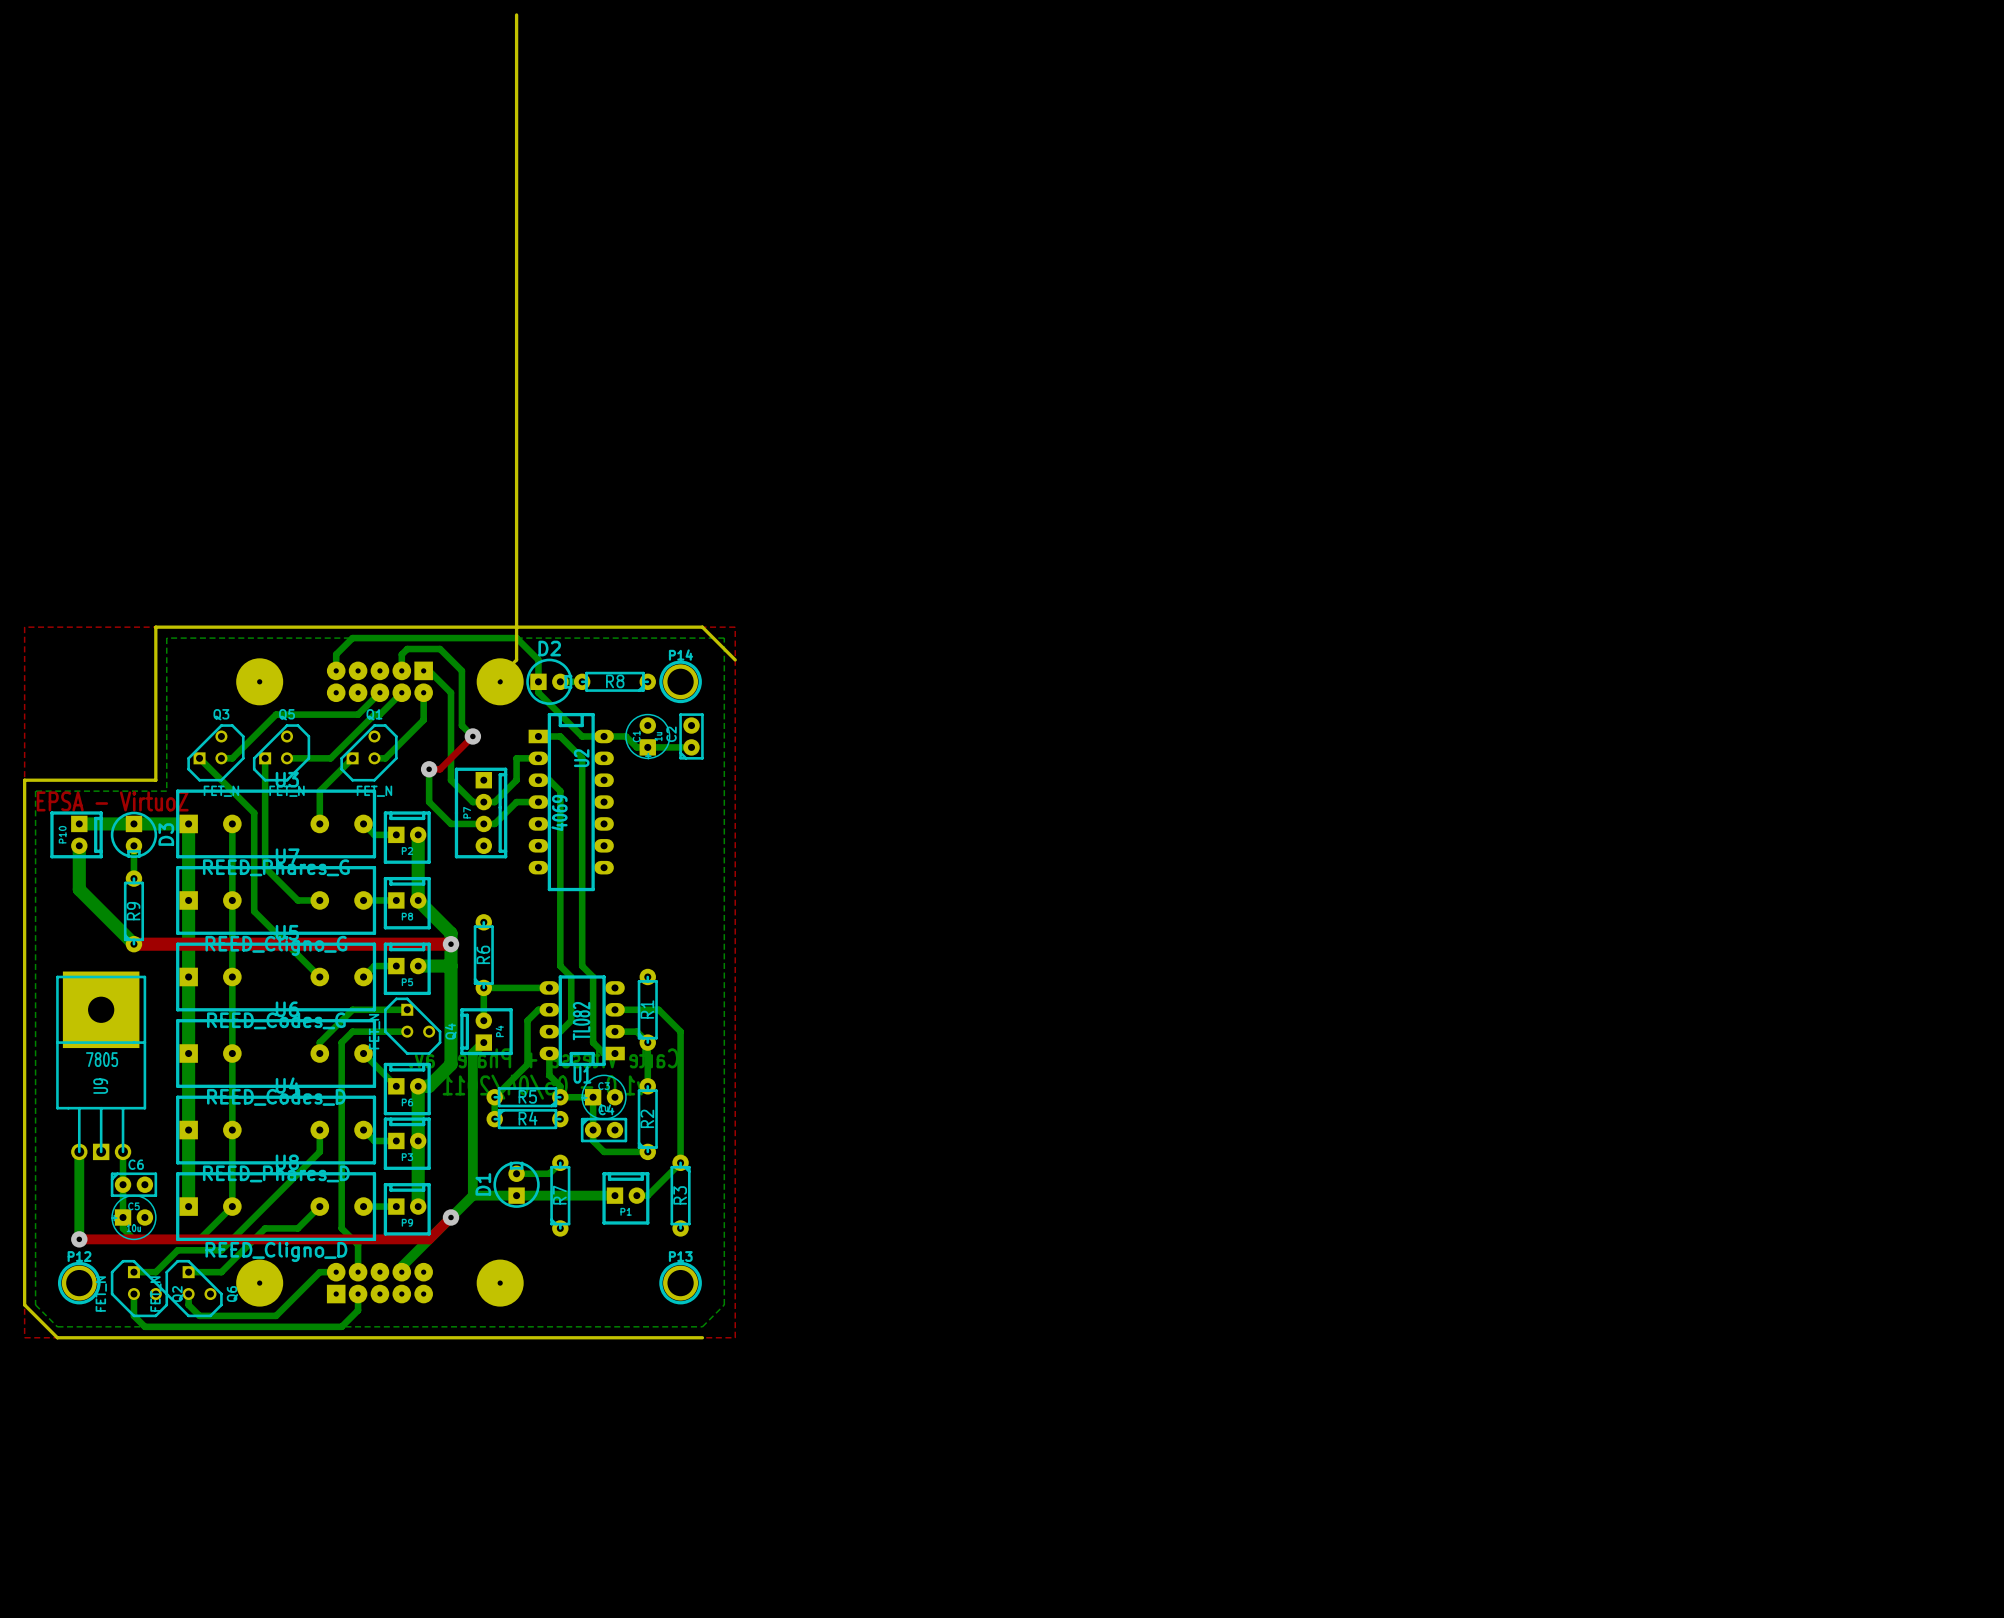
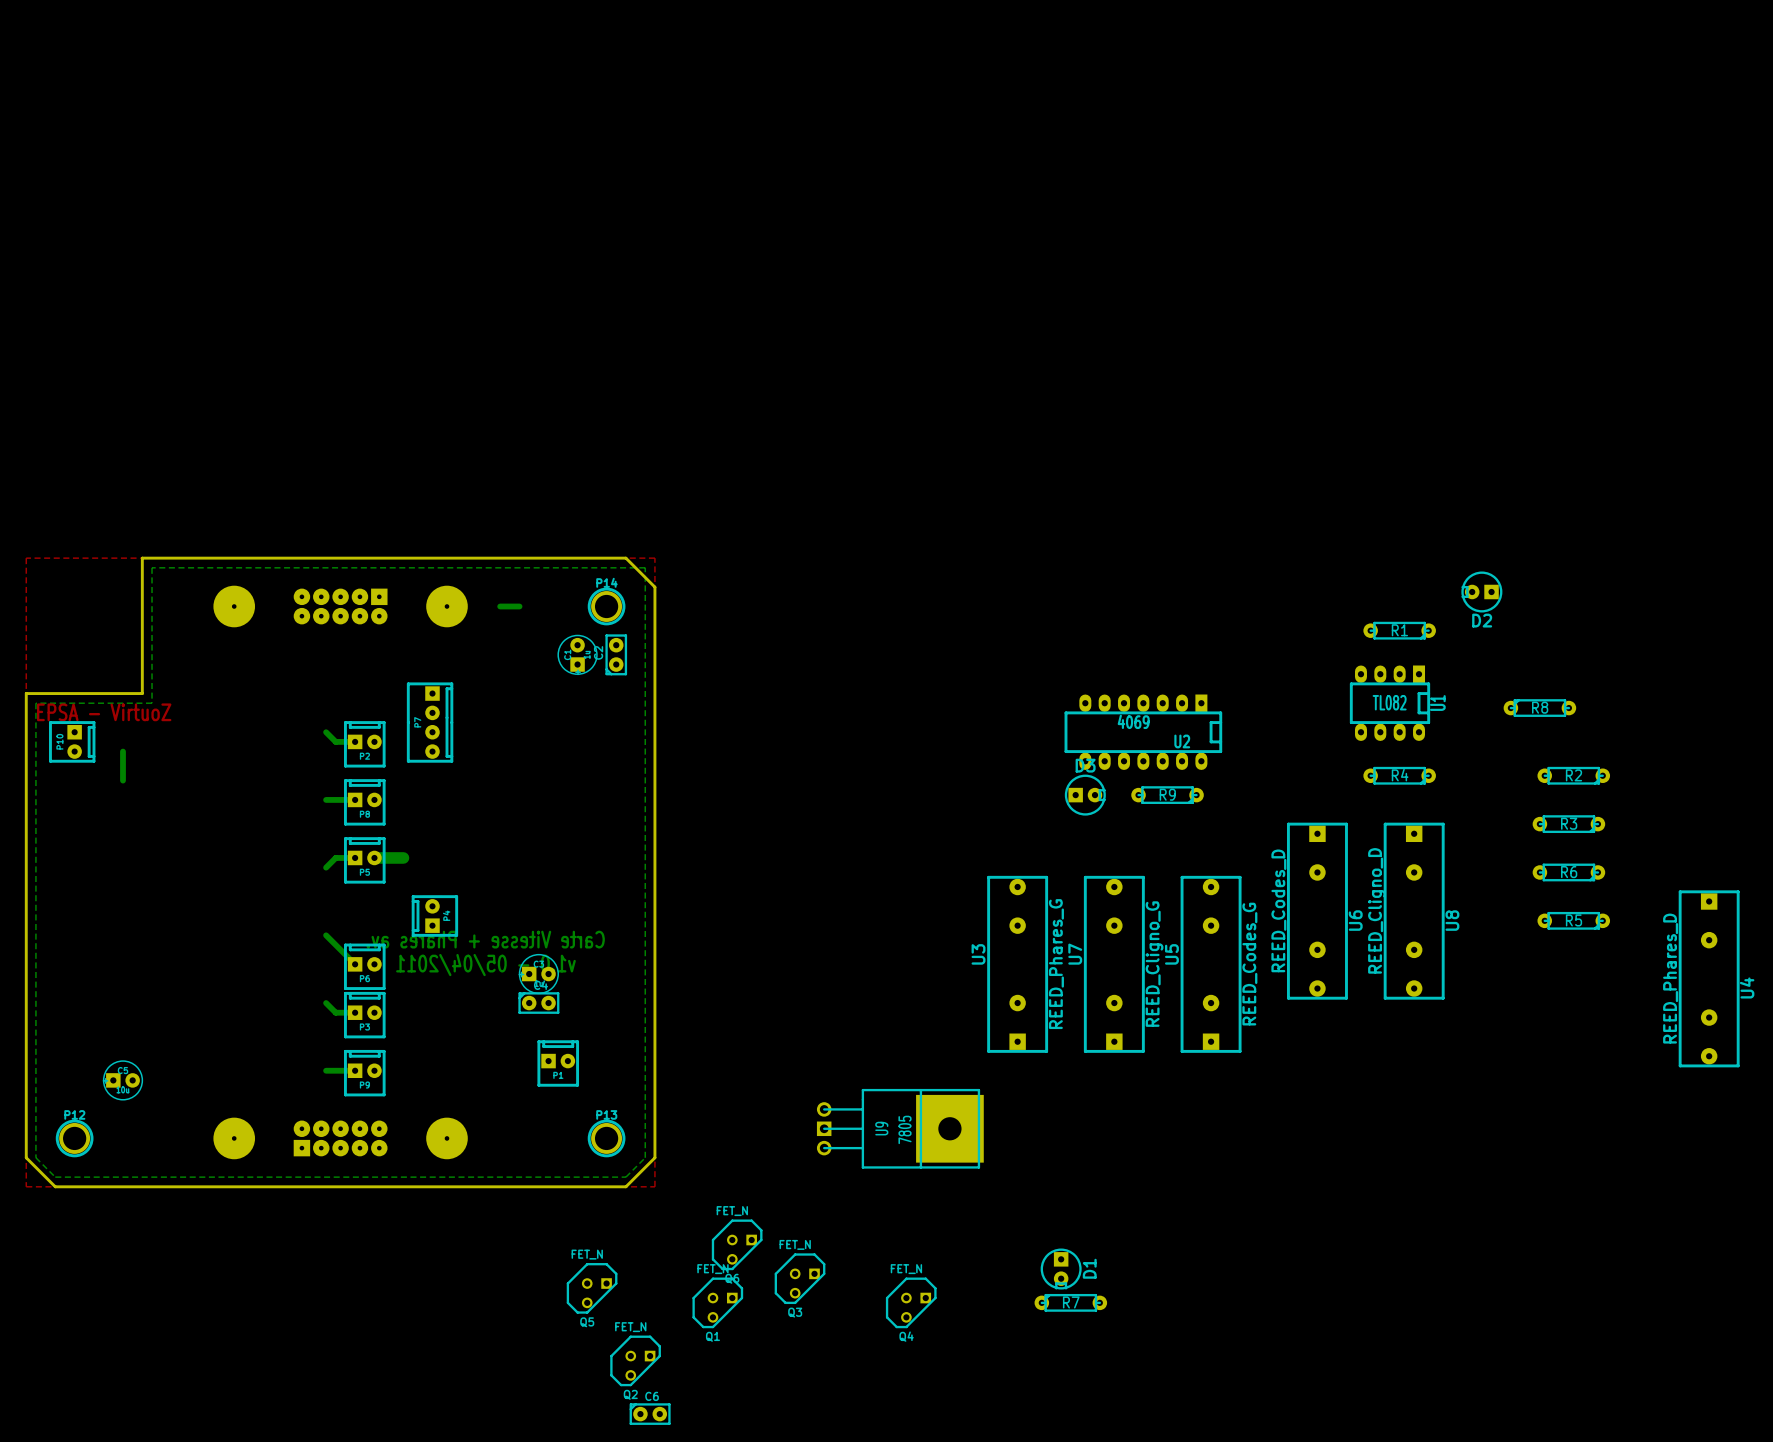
board edge: (516, 14) (516, 659) (483, 692) -> none
board edge: none -> (654, 587) (654, 1157) (625, 1186)
bottom track: (336, 670) (336, 654) (352, 638) (516, 638) (538, 659) (538, 692) (582, 736) (625, 736) (636, 747) (691, 747) -> none
bottom track: (401, 670) (401, 654) (407, 649) (440, 649) (461, 670) (461, 725) (472, 736) -> none
bottom track: (423, 670) (429, 670) (451, 692) (451, 780) (472, 802) (494, 802) (516, 780) (516, 758) (538, 758) -> none
D2 rotation: 0° (549, 681) -> 180° (1481, 591)
D2 position: (549, 681) -> (1481, 591)
R8 rotation: 0° (614, 681) -> 180° (1539, 708)
R8 position: (614, 681) -> (1539, 708)
bottom track: (379, 692) (358, 714) (276, 714) (232, 758) (221, 758) -> none
bottom track: (401, 692) (379, 714) (374, 714) (330, 758) (287, 758) -> none
bottom track: (423, 692) (423, 720) (385, 758) (374, 758) -> none
top track: (472, 736) (440, 769) (429, 769) -> none
via: (472, 736) -> none
bottom track: (538, 736) (560, 736) (582, 758) (582, 966) (593, 976) (593, 1042) (604, 1053) (614, 1053) -> none
Q3 rotation: 0° (215, 752) -> 180° (800, 1278)
Q3 position: (215, 752) -> (800, 1278)
Q5 rotation: 0° (281, 752) -> 180° (592, 1288)
Q5 position: (281, 752) -> (592, 1288)
Q1 rotation: 0° (369, 752) -> 180° (717, 1302)
Q1 position: (369, 752) -> (717, 1302)
bottom track: (199, 758) (254, 813) (254, 911) (319, 976) -> none
bottom track: (265, 758) (265, 867) (297, 900) (319, 900) -> none
bottom track: (352, 758) (319, 791) (319, 823) -> none
bottom track: (429, 769) (429, 802) (451, 823) (494, 823) (516, 802) (538, 802) -> none
via: (429, 769) -> none
bottom track: (538, 780) (549, 780) (560, 791) (560, 966) (571, 976) (571, 1020) (560, 1031) (549, 1031) -> none
U2 rotation: 0° (571, 802) -> 90° clockwise (1143, 732)
U2 position: (571, 802) -> (1143, 732)
bottom track: (79, 823) (188, 823) (188, 1206) -> none
bottom track: (232, 823) (232, 1206) (199, 1239) (133, 1239) (123, 1228) (123, 1151) -> none
U3 rotation: 0° (276, 823) -> 90° counterclockwise (1017, 964)
U3 position: (276, 823) -> (1017, 964)
D3 rotation: 0° (133, 834) -> 90° counterclockwise (1085, 795)
D3 position: (133, 834) -> (1085, 795)
bottom track: (418, 834) (418, 900) (451, 933) (451, 1064) (429, 1086) (418, 1086) (418, 1206) -> none
bottom track: (79, 845) (79, 889) (133, 944) -> none
U7 rotation: 0° (276, 900) -> 90° counterclockwise (1114, 964)
U7 position: (276, 900) -> (1114, 964)
R9 rotation: 0° (133, 911) -> 90° counterclockwise (1167, 795)
R9 position: (133, 911) -> (1167, 795)
top track: (133, 944) (451, 944) -> none
via: (451, 944) -> none
R6 rotation: 0° (483, 955) -> 90° counterclockwise (1568, 872)
R6 position: (483, 955) -> (1568, 872)
U5 rotation: 0° (276, 976) -> 90° counterclockwise (1211, 964)
U5 position: (276, 976) -> (1211, 964)
bottom track: (549, 987) (483, 987) (483, 1020) -> none
bottom track: (407, 1009) (352, 1009) (319, 1042) (319, 1053) -> none
bottom track: (549, 1009) (538, 1009) (527, 1020) (527, 1064) (494, 1097) (494, 1119) -> none
bottom track: (614, 1009) (658, 1009) (680, 1031) (680, 1162) (647, 1195) (636, 1195) -> none
R1 rotation: 0° (647, 1009) -> 90° counterclockwise (1399, 630)
R1 position: (647, 1009) -> (1399, 630)
U1 rotation: 0° (582, 1020) -> 90° counterclockwise (1389, 703)
U1 position: (582, 1020) -> (1389, 703)
Q4 rotation: 0° (412, 1026) -> 90° clockwise (911, 1302)
Q4 position: (412, 1026) -> (911, 1302)
bottom track: (407, 1031) (352, 1031) (341, 1042) (341, 1228) (358, 1244) (358, 1272) -> none
bottom track: (614, 1031) (636, 1031) (647, 1042) (647, 1086) -> none
bottom track: (483, 1042) (472, 1053) (472, 1195) -> none
U6 rotation: 0° (276, 1053) -> 90° clockwise (1317, 911)
U6 position: (276, 1053) -> (1317, 911)
bottom track: (549, 1053) (549, 1075) (560, 1086) (560, 1097) (593, 1097) (593, 1140) (604, 1151) (647, 1151) -> none
U9 rotation: 0° (101, 1065) -> 90° clockwise (900, 1128)
U9 position: (101, 1065) -> (900, 1128)
R5 position: (527, 1097) -> (1573, 920)
R4 rotation: 0° (527, 1119) -> 180° (1399, 775)
R4 position: (527, 1119) -> (1399, 775)
R2 rotation: 0° (647, 1119) -> 90° counterclockwise (1573, 775)
R2 position: (647, 1119) -> (1573, 775)
U4 rotation: 0° (276, 1130) -> 90° clockwise (1709, 978)
U4 position: (276, 1130) -> (1709, 978)
bottom track: (319, 1130) (319, 1151) (221, 1250) (177, 1250) (155, 1272) (133, 1272) -> none
bottom track: (79, 1151) (79, 1239) -> none
bottom track: (560, 1162) (549, 1173) (516, 1173) -> none
C6 position: (133, 1184) -> (650, 1414)
D1 rotation: 0° (516, 1184) -> 180° (1061, 1269)
D1 position: (516, 1184) -> (1061, 1269)
bottom track: (472, 1195) (614, 1195) -> none
bottom track: (472, 1195) (401, 1266) (401, 1272) -> none
R7 rotation: 0° (560, 1195) -> 90° clockwise (1070, 1302)
R7 position: (560, 1195) -> (1070, 1302)
R3 rotation: 0° (680, 1195) -> 90° clockwise (1568, 824)
R3 position: (680, 1195) -> (1568, 824)
U8 rotation: 0° (276, 1206) -> 90° clockwise (1414, 911)
U8 position: (276, 1206) -> (1414, 911)
bottom track: (319, 1206) (297, 1228) (265, 1228) (221, 1272) (188, 1272) -> none
top track: (451, 1217) (429, 1239) (79, 1239) -> none
via: (451, 1217) -> none
via: (79, 1239) -> none
bottom track: (336, 1272) (319, 1272) (276, 1315) (199, 1315) (188, 1304) (188, 1294) -> none
Q2 rotation: 0° (139, 1288) -> 90° clockwise (635, 1360)
Q2 position: (139, 1288) -> (635, 1360)
Q6 rotation: 0° (194, 1288) -> 90° clockwise (737, 1244)
Q6 position: (194, 1288) -> (737, 1244)
bottom track: (133, 1294) (133, 1315) (144, 1326) (341, 1326) (358, 1310) (358, 1294) -> none

